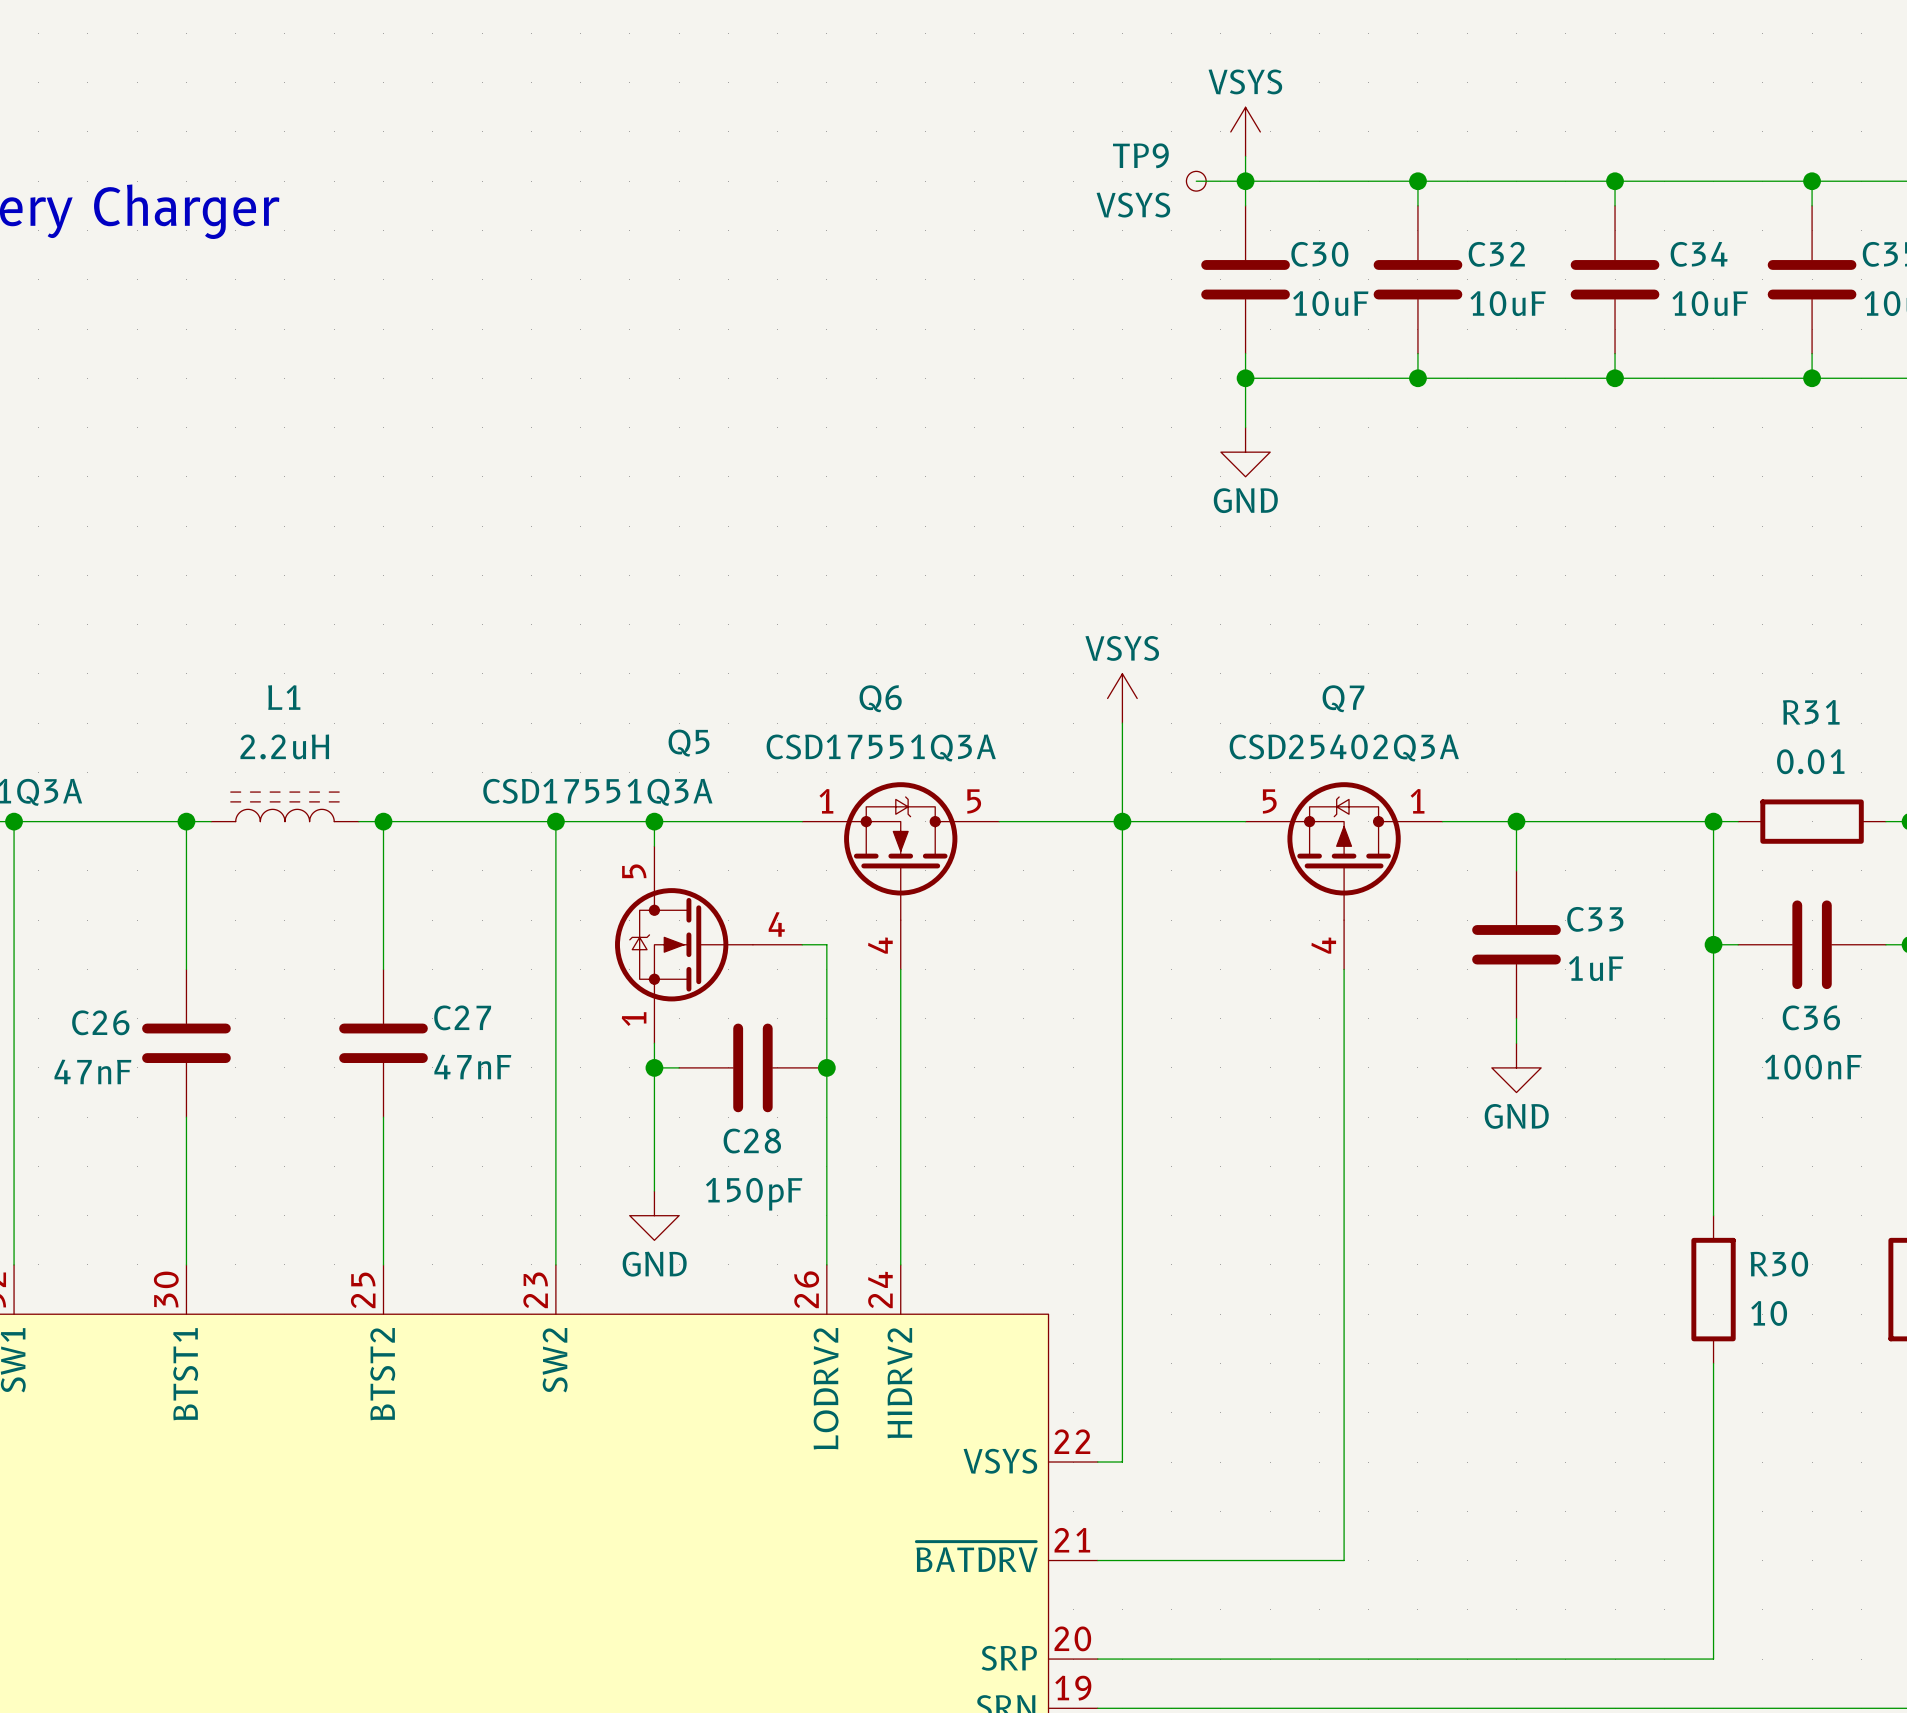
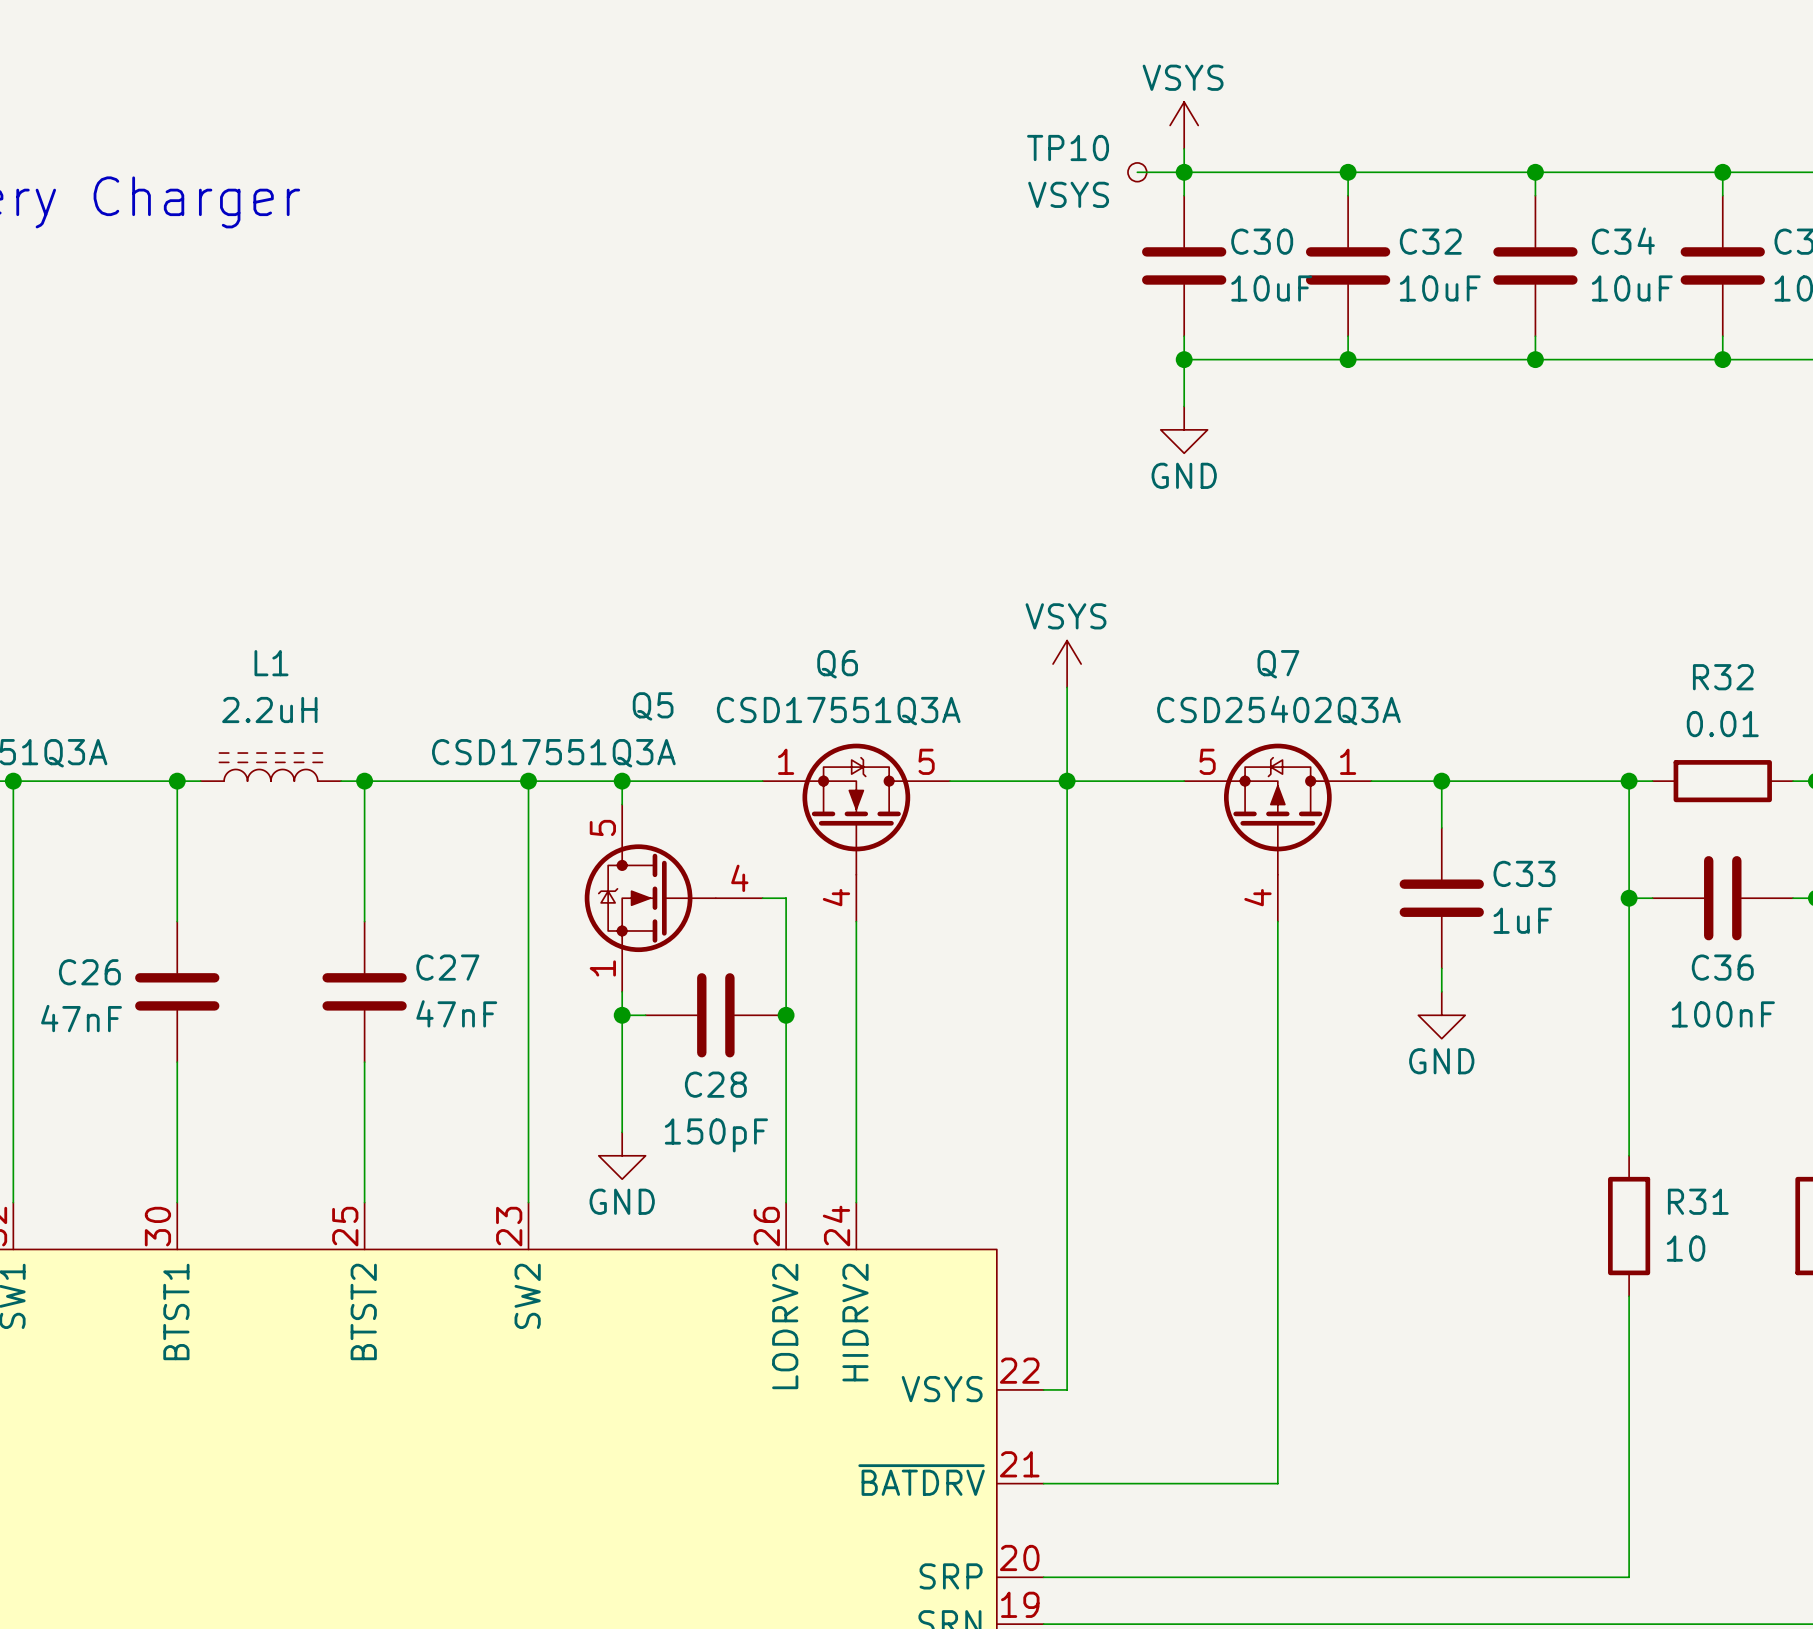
TP9 name: TP9 (1140, 155) -> TP10 (1068, 148)
R31 name: R31 (1811, 712) -> R32 (1723, 677)
R30 name: R30 (1779, 1264) -> R31 (1698, 1201)

